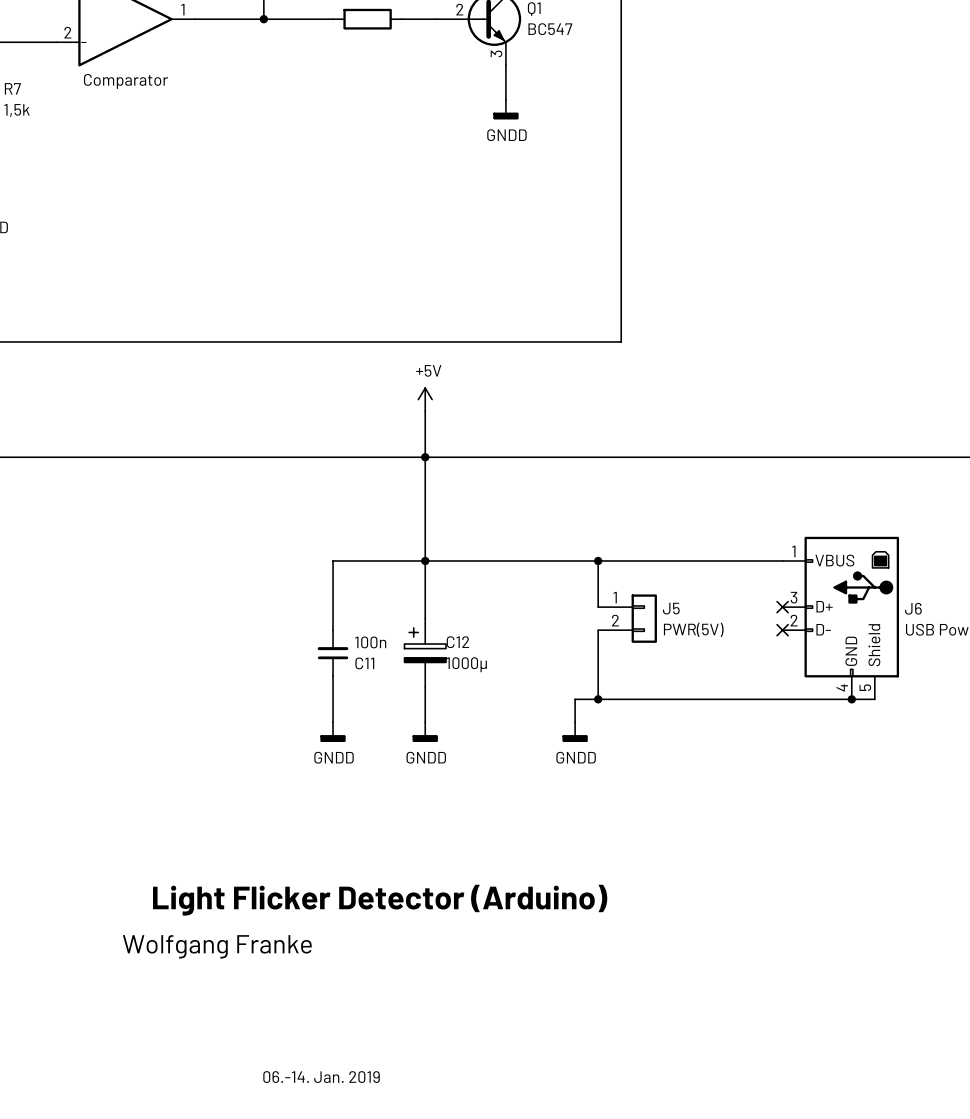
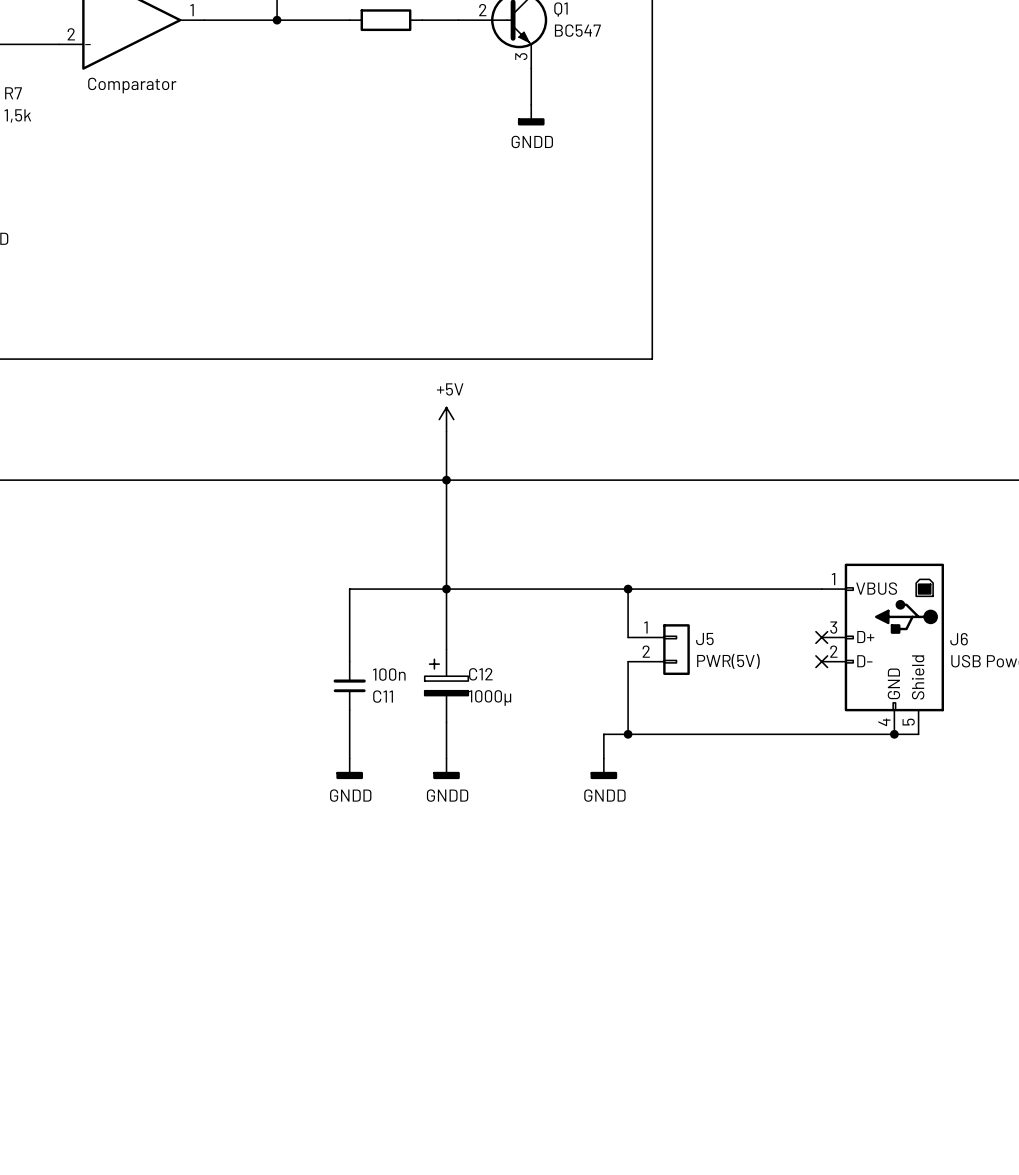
text: Light Flicker Detector (Arduino) (380, 900) -> none
text: Wolfgang Franke (217, 946) -> none
text: 06.-14. Jan. 2019 (321, 1077) -> none

